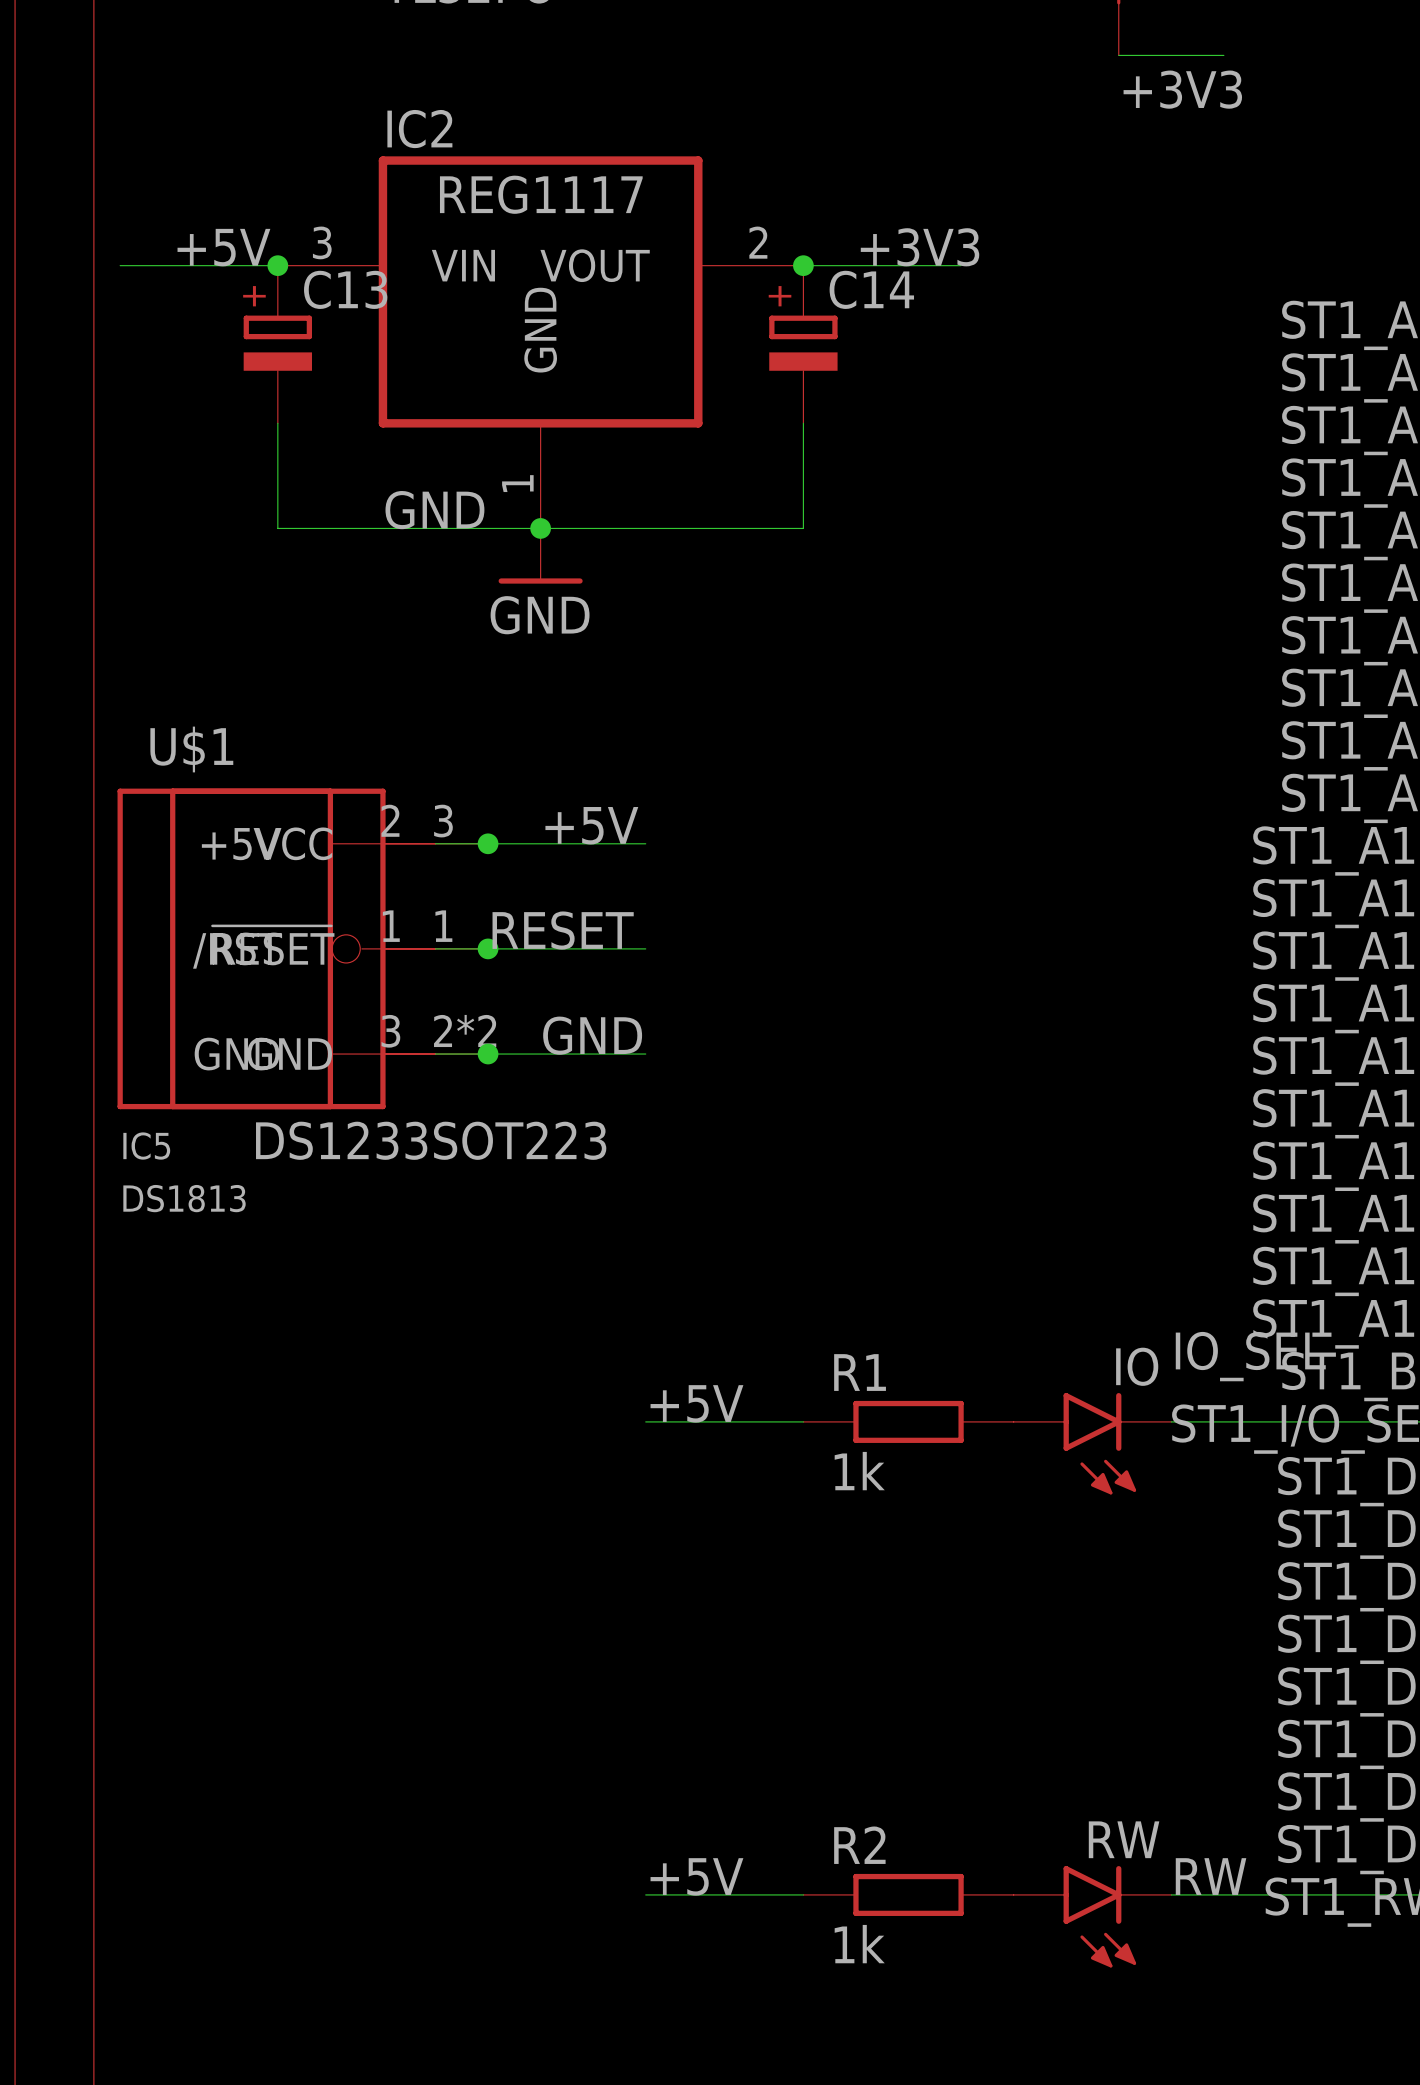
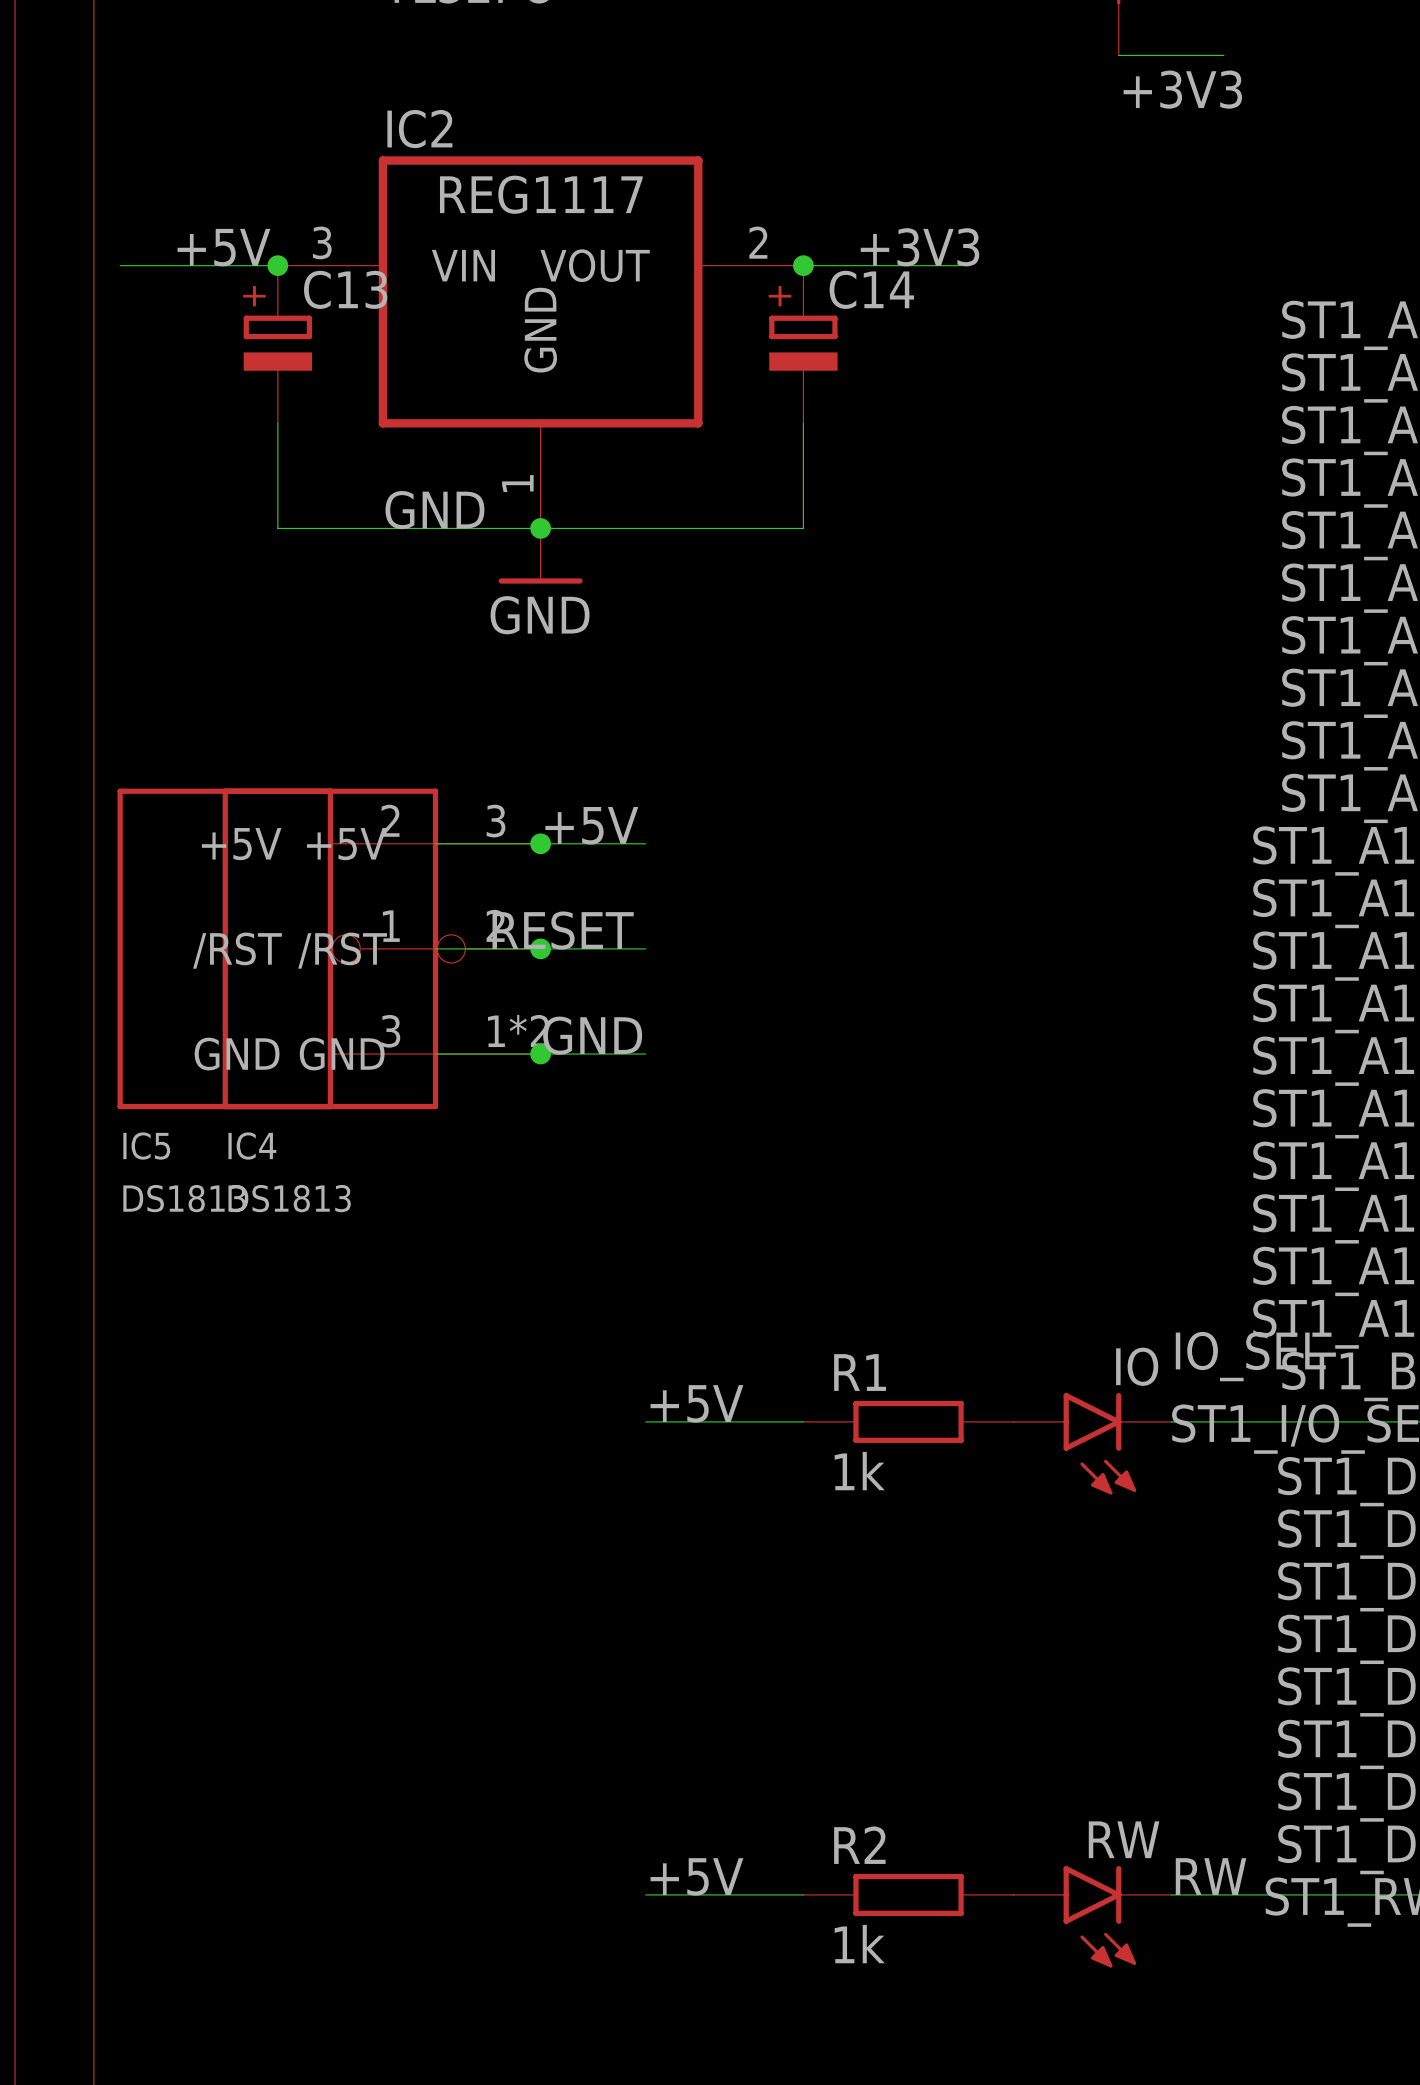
junction position: (488, 843) -> (540, 843)
U$1: DS1233SOT223 (329, 948) -> none
IC4: none -> DS1813 (381, 948)
junction position: (488, 948) -> (540, 948)
junction position: (488, 1054) -> (540, 1054)

